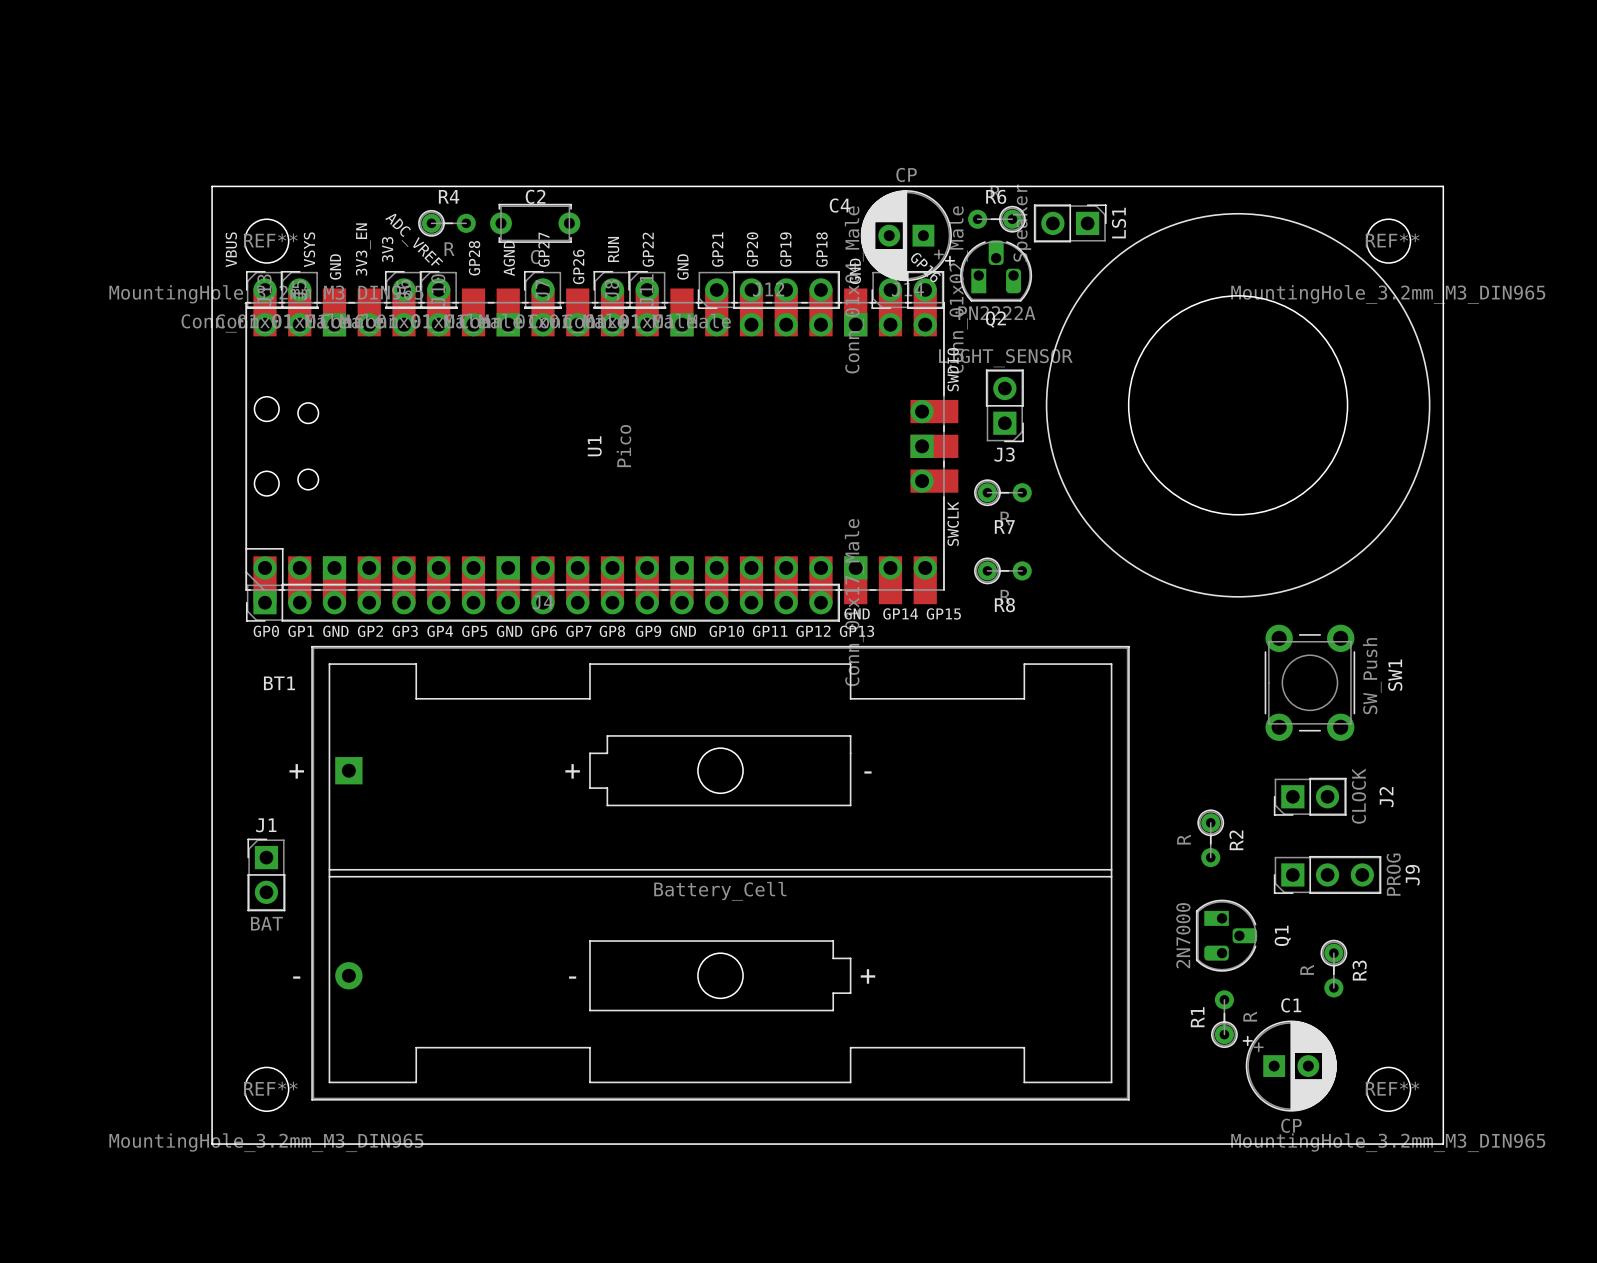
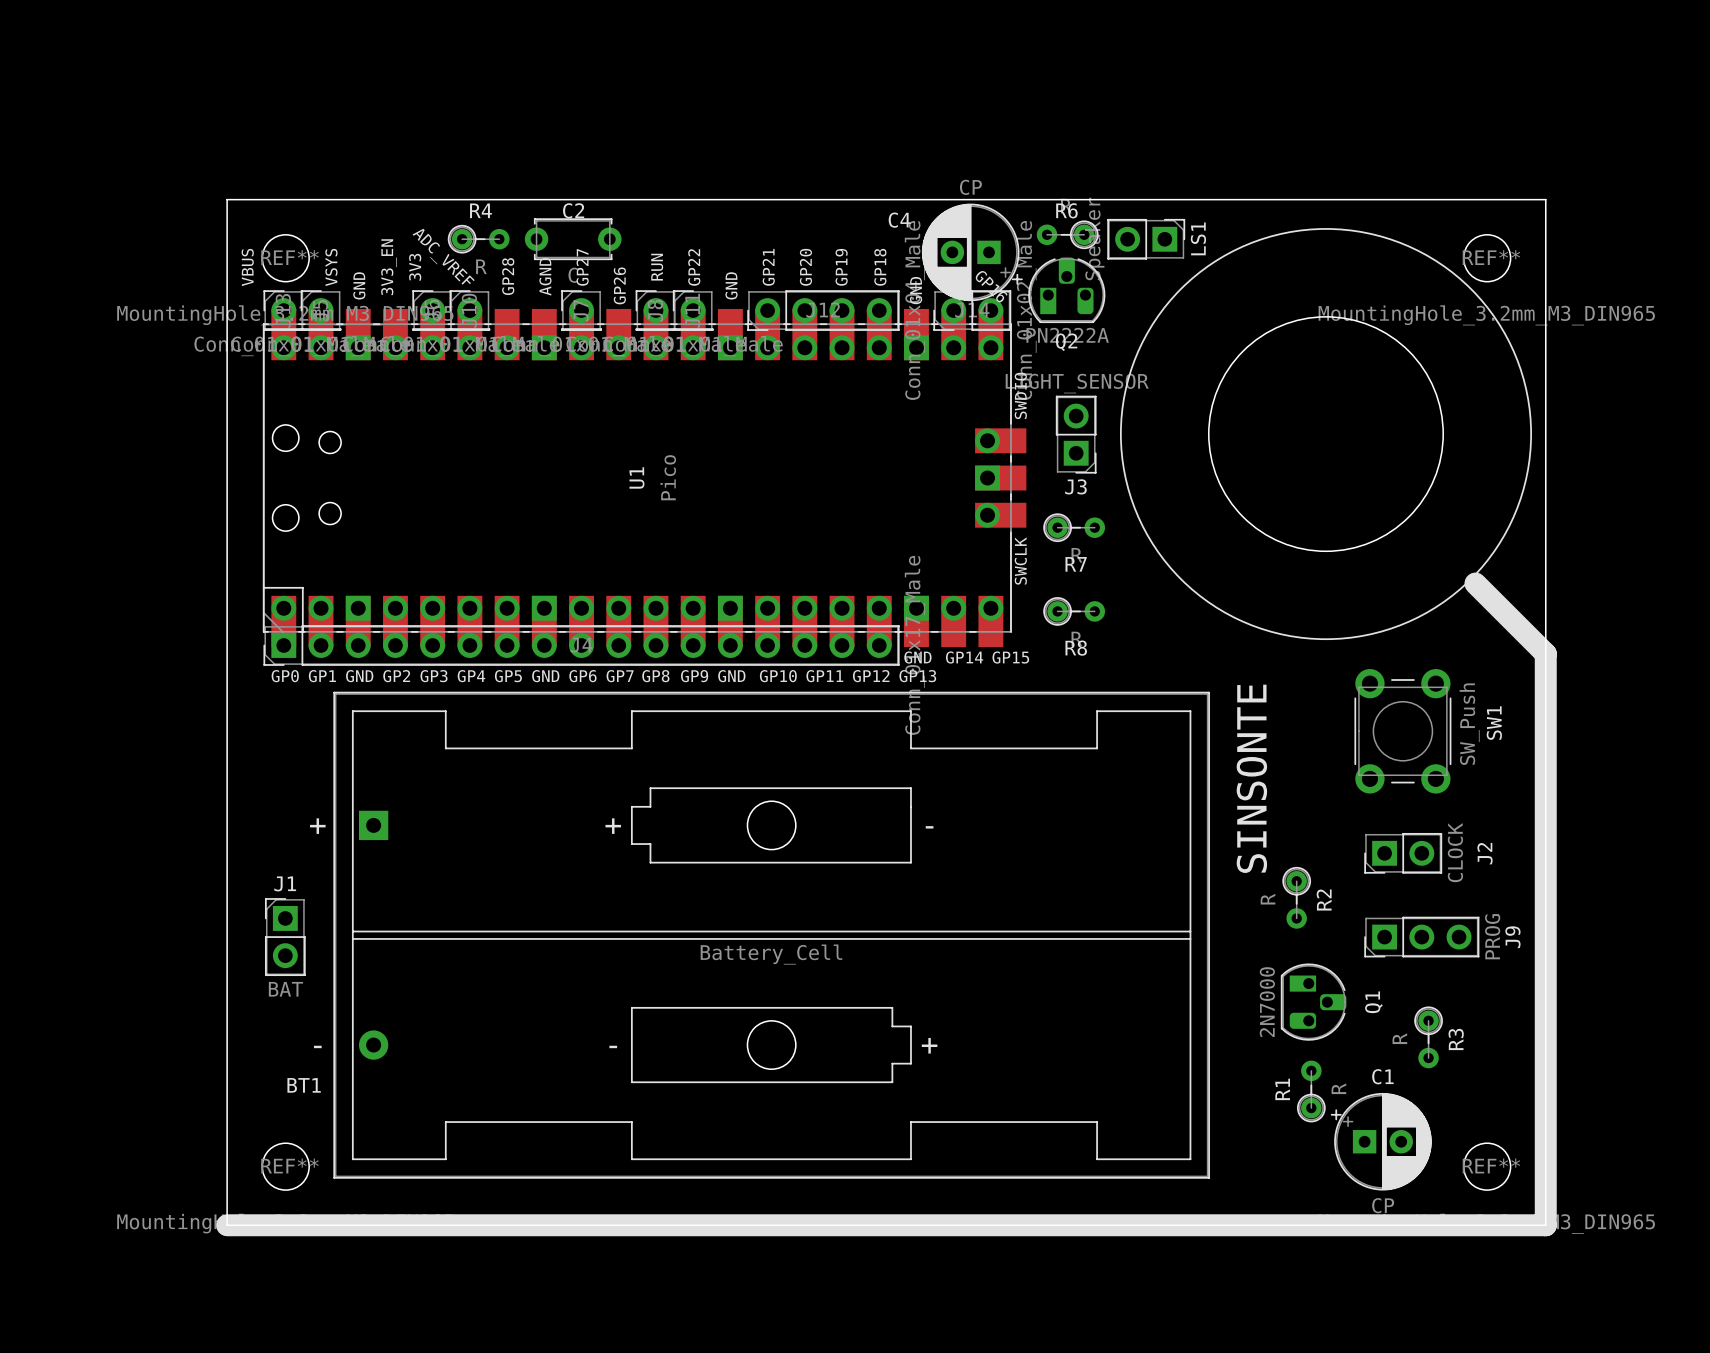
line: none -> (1475, 583) (1545, 653) (1545, 1225) (227, 1225)
BT1 name position: BT1 (279, 683) -> BT1 (304, 1085)
text: none -> SINSONTE (1251, 778)

